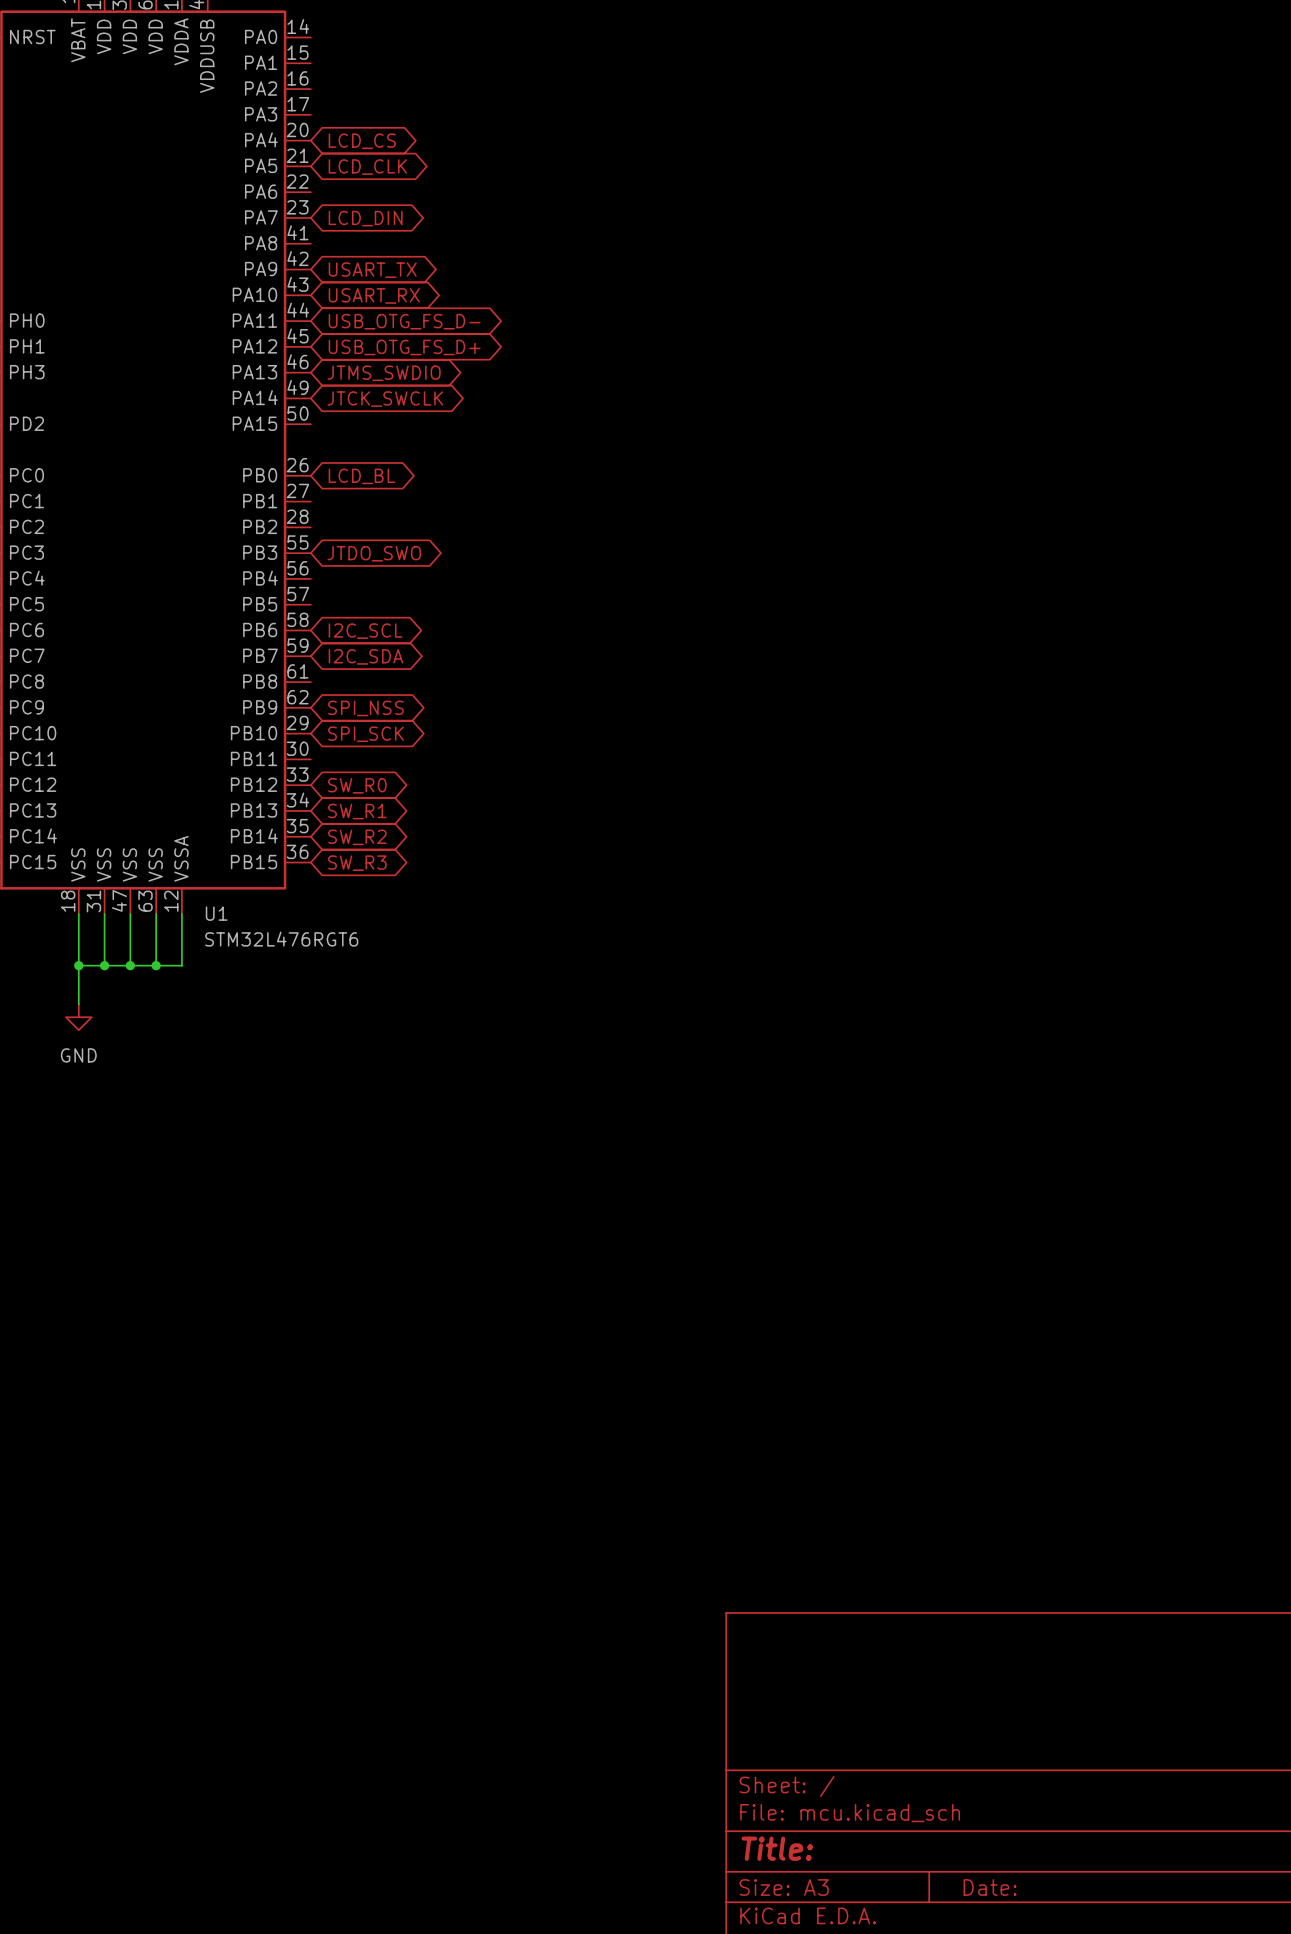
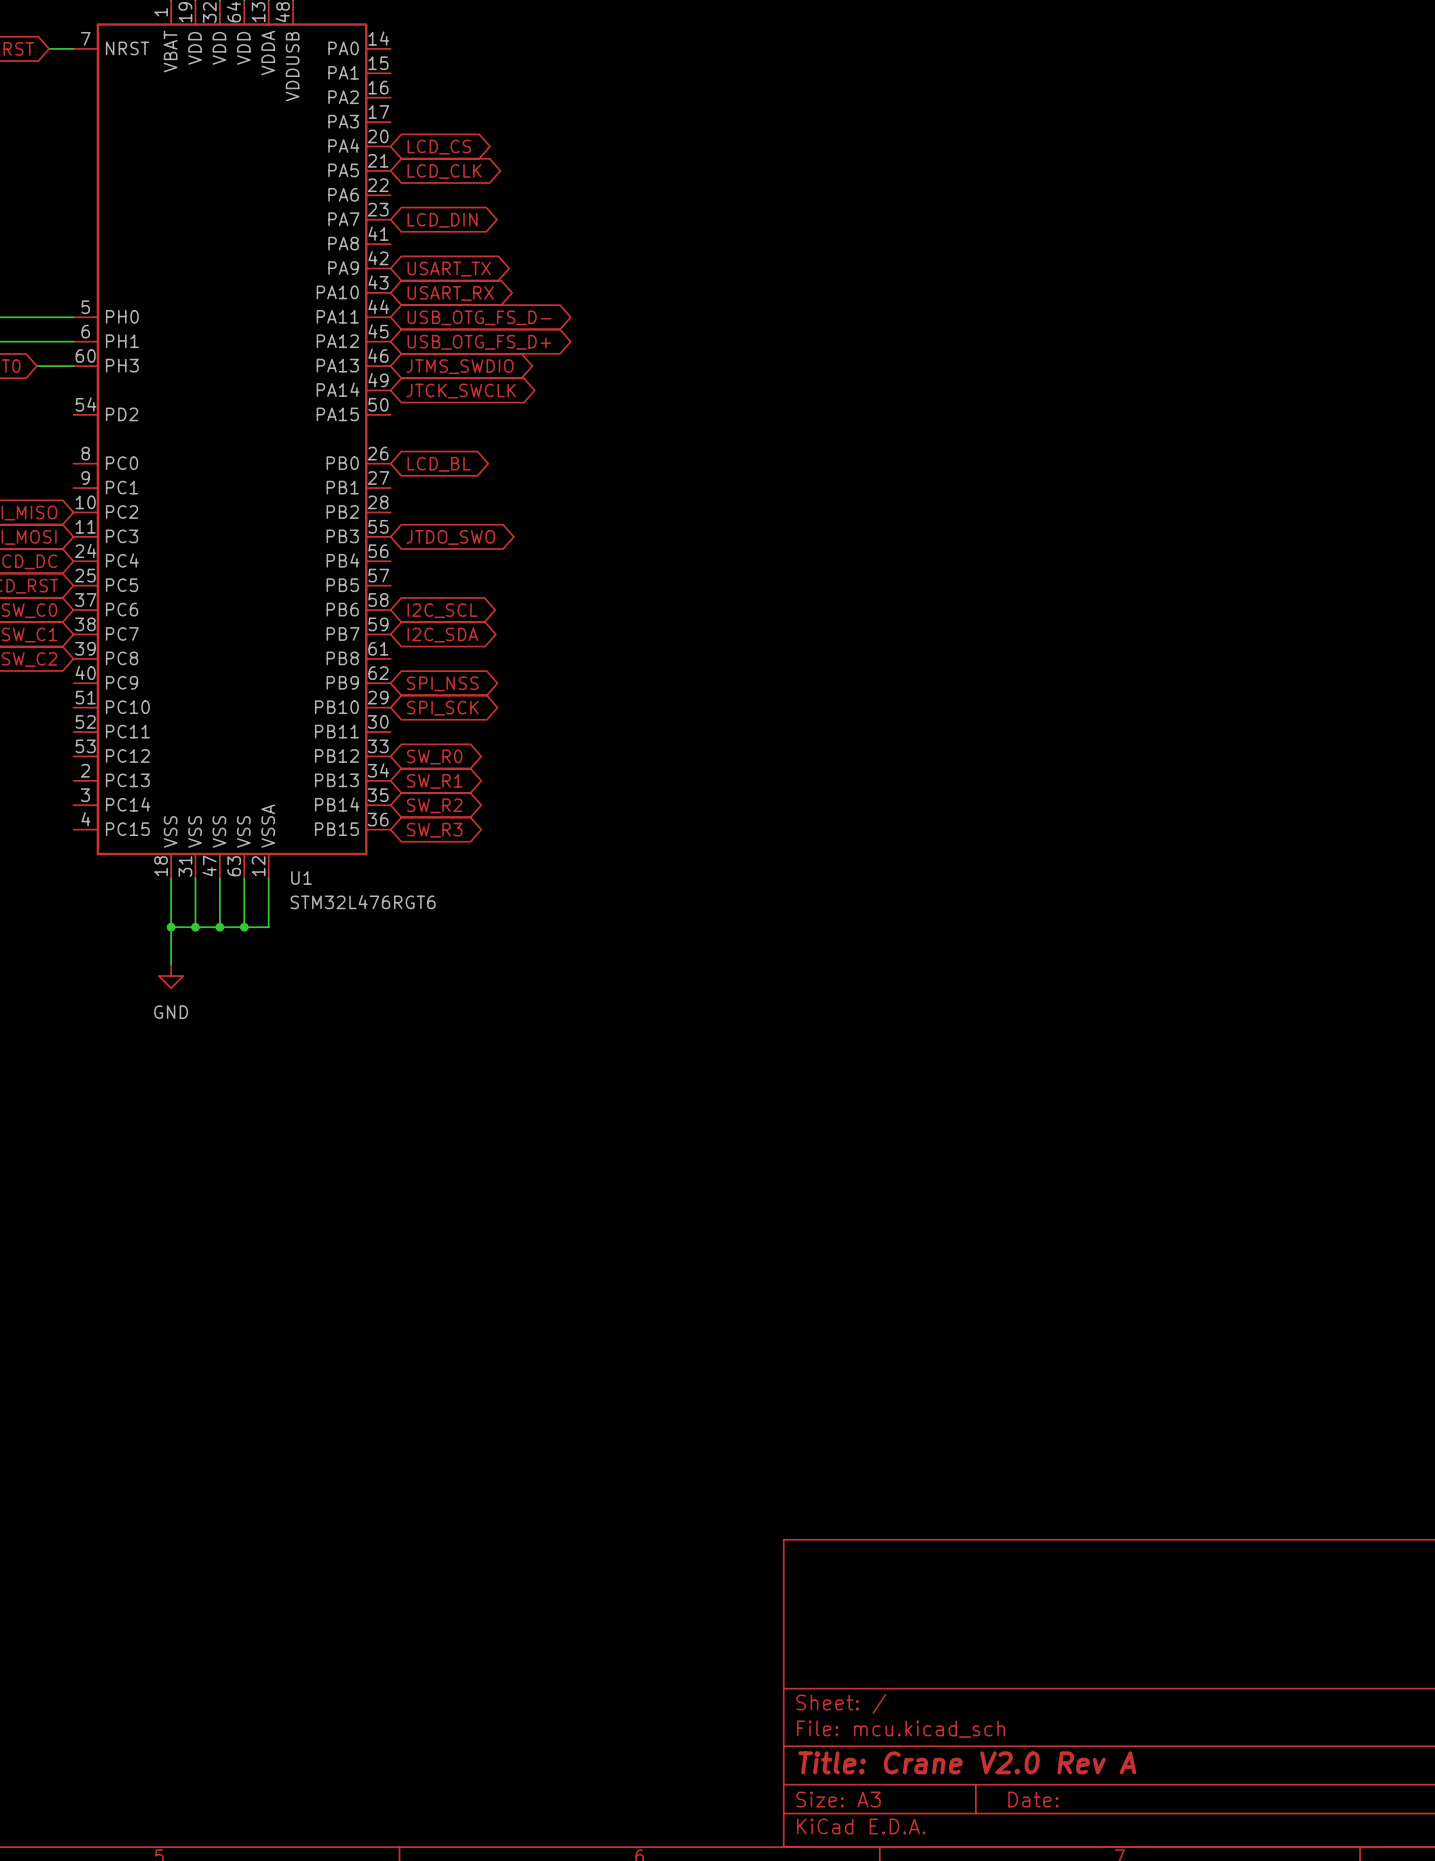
title block: Title: (777, 1848) -> Title: Crane V2.0 Rev A (967, 1762)

